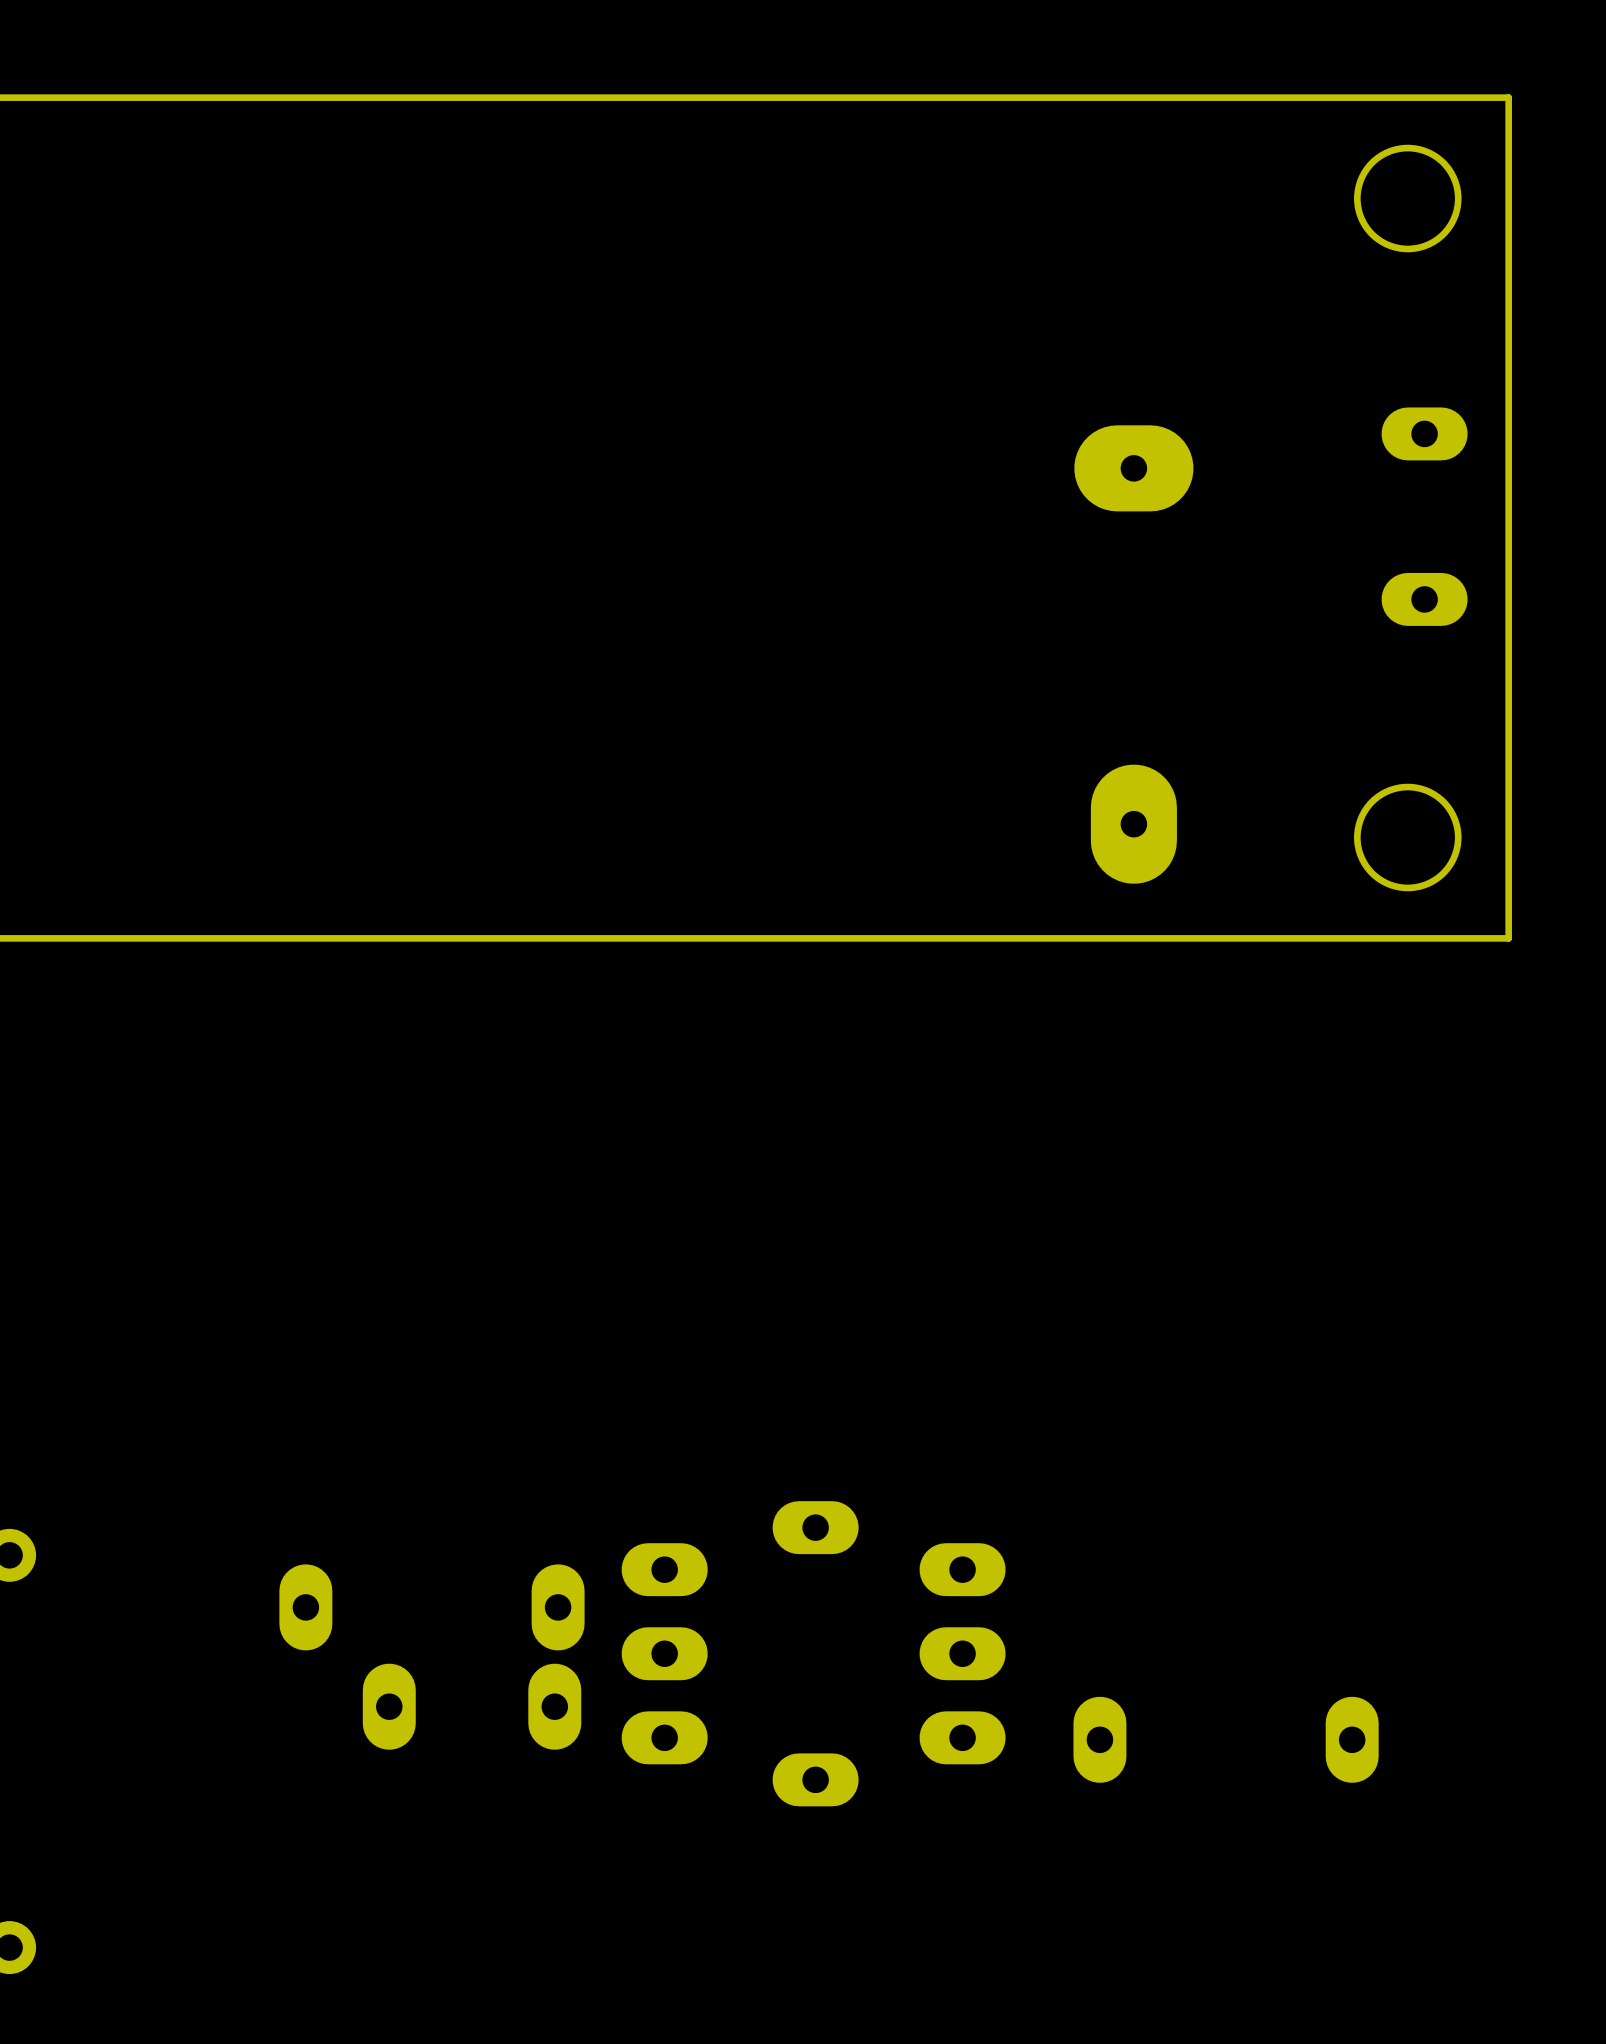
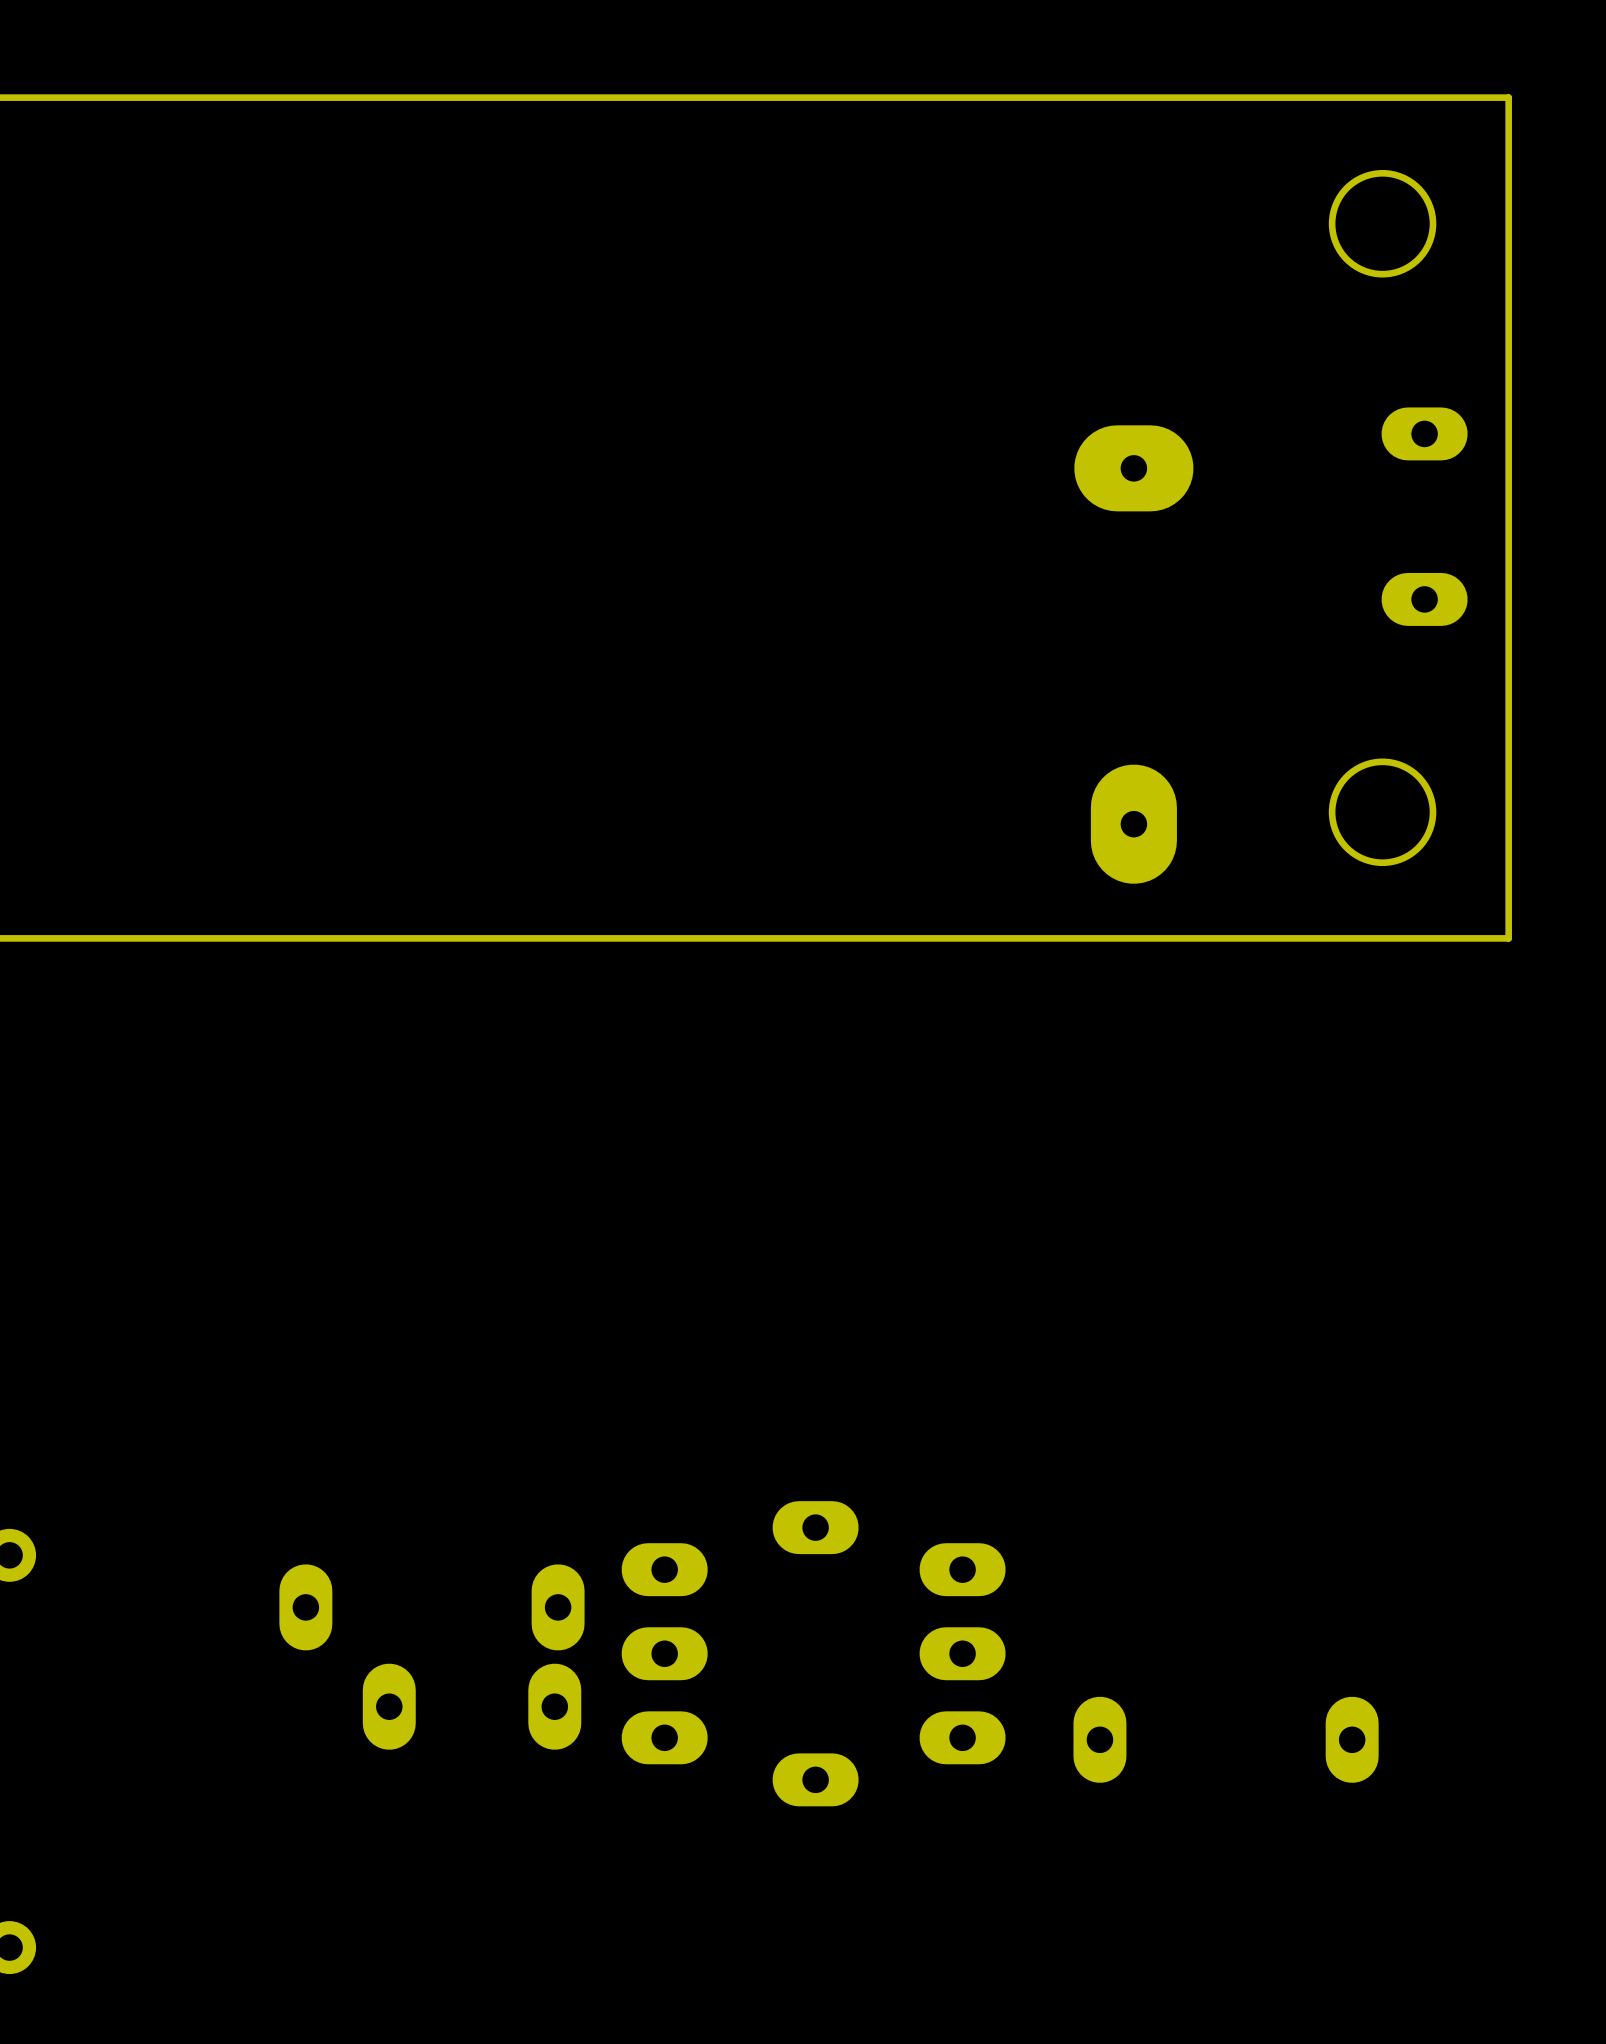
round board edge position: (1407, 198) -> (1382, 223)
round board edge position: (1407, 837) -> (1382, 812)

